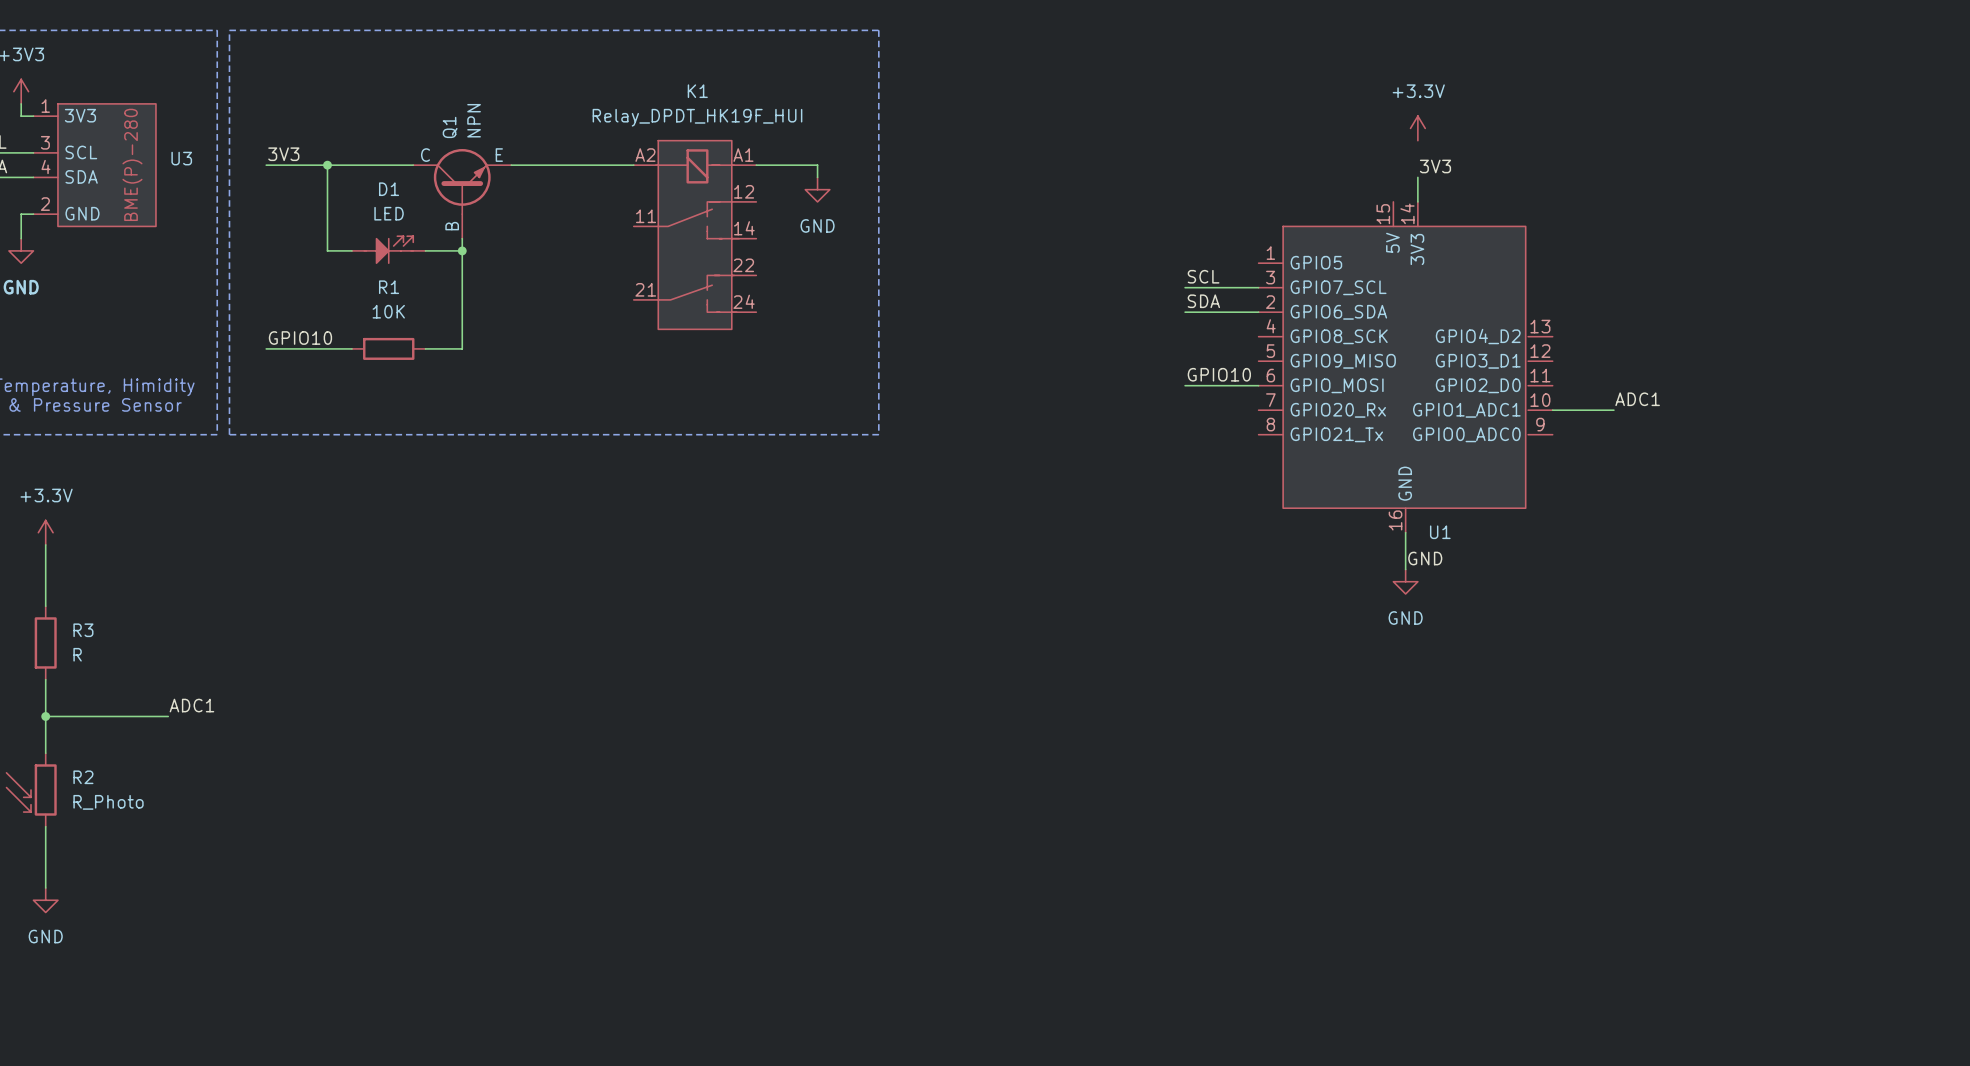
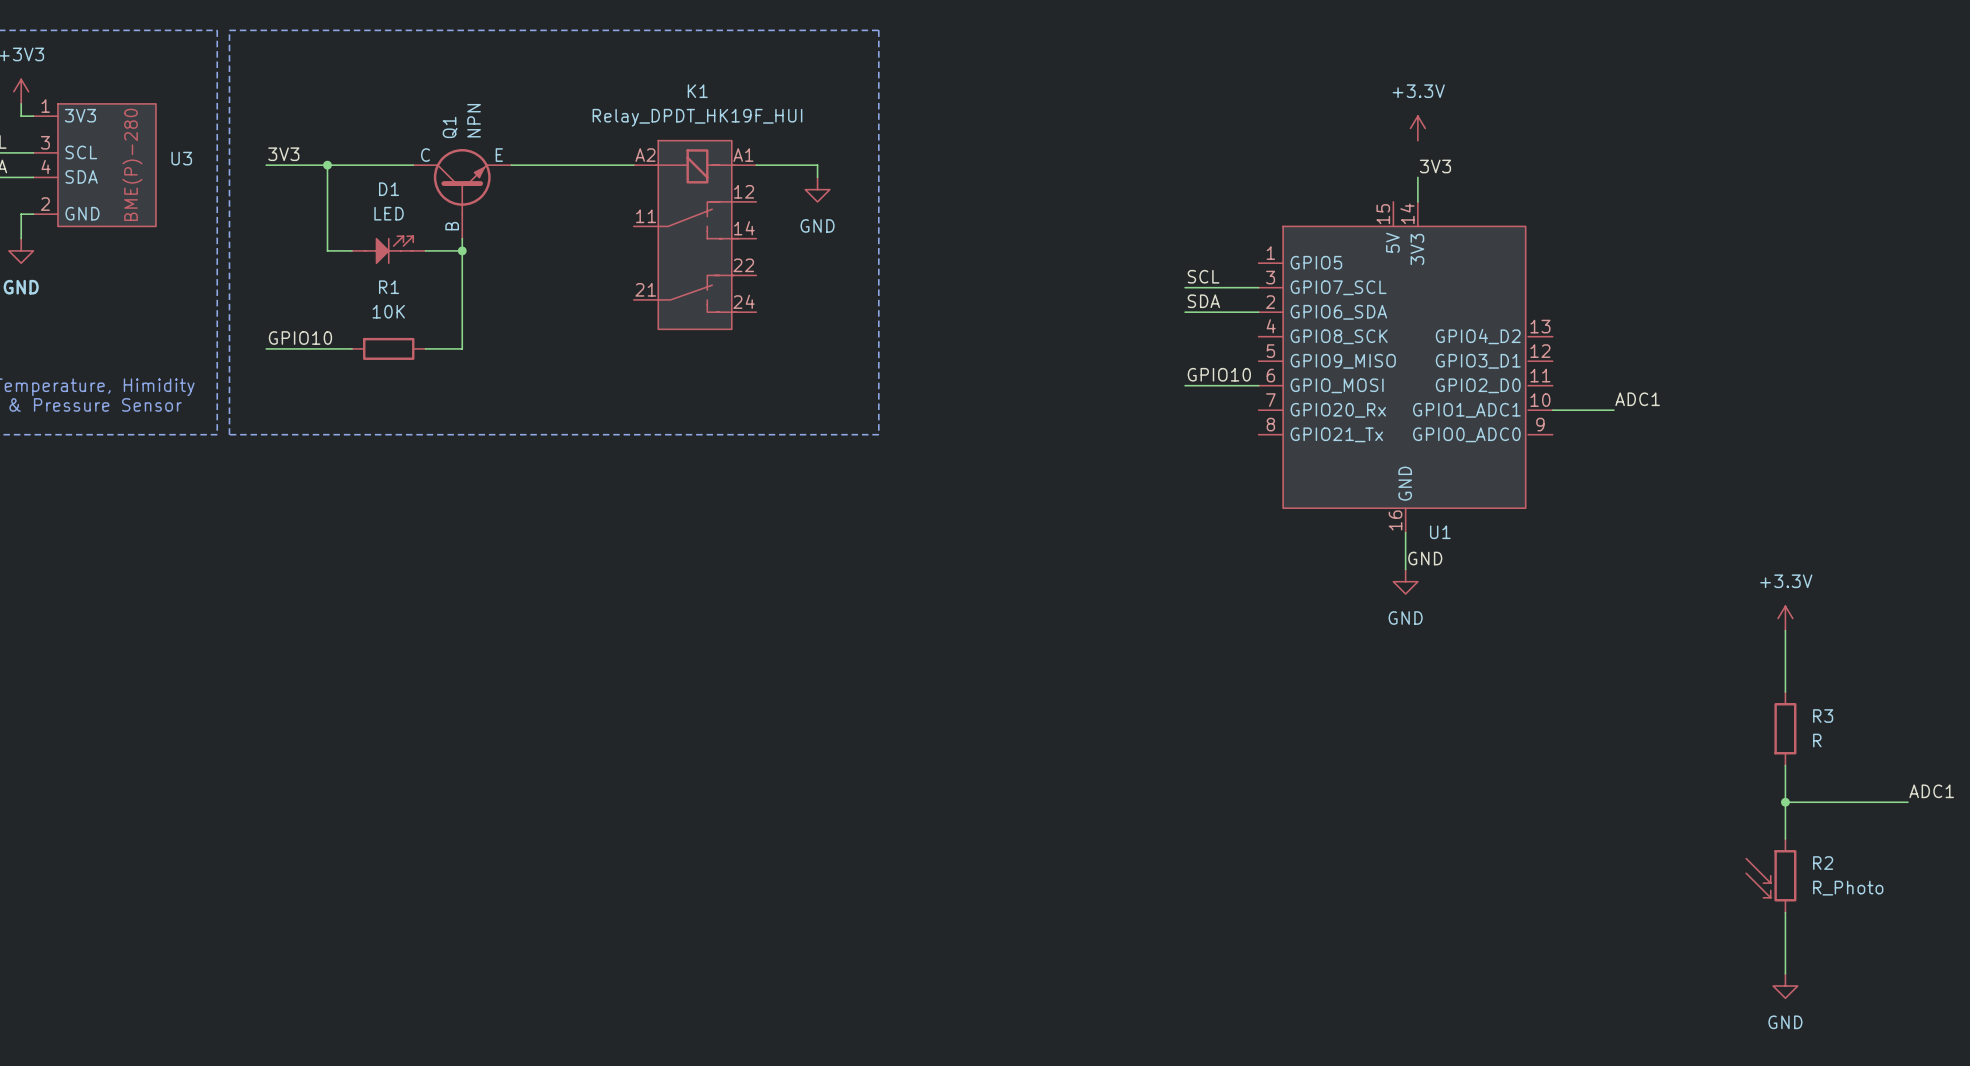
power symbol: +3.3V (45, 532) -> none
wire: (45, 544) (45, 606) -> none
power symbol: none -> +3.3V (1785, 618)
wire: none -> (1785, 630) (1785, 691)
R3 position: (45, 642) -> (1785, 728)
wire: (45, 679) (45, 753) -> none
label: ADC1 (191, 705) -> none
wire: (45, 716) (168, 716) -> none
junction: (45, 716) -> none
wire: none -> (1785, 765) (1785, 839)
R2 position: (31, 789) -> (1771, 875)
label: none -> ADC1 (1931, 791)
wire: none -> (1785, 802) (1907, 802)
junction: none -> (1785, 802)
wire: (45, 826) (45, 888) -> none
power symbol: GND (45, 900) -> none
wire: none -> (1785, 912) (1785, 973)
power symbol: none -> GND (1785, 986)

